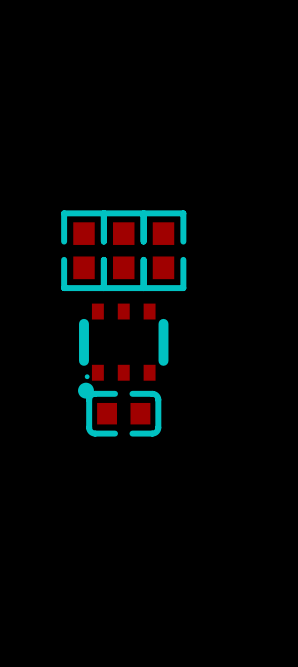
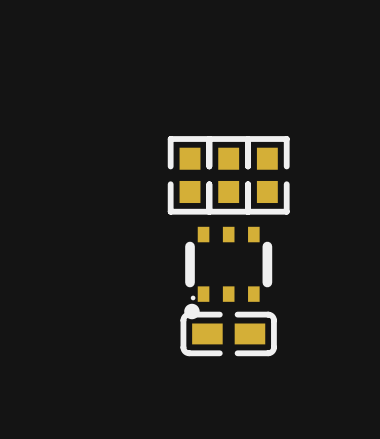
part footprint: [86, 390, 162, 437] -> [180, 311, 277, 357]

